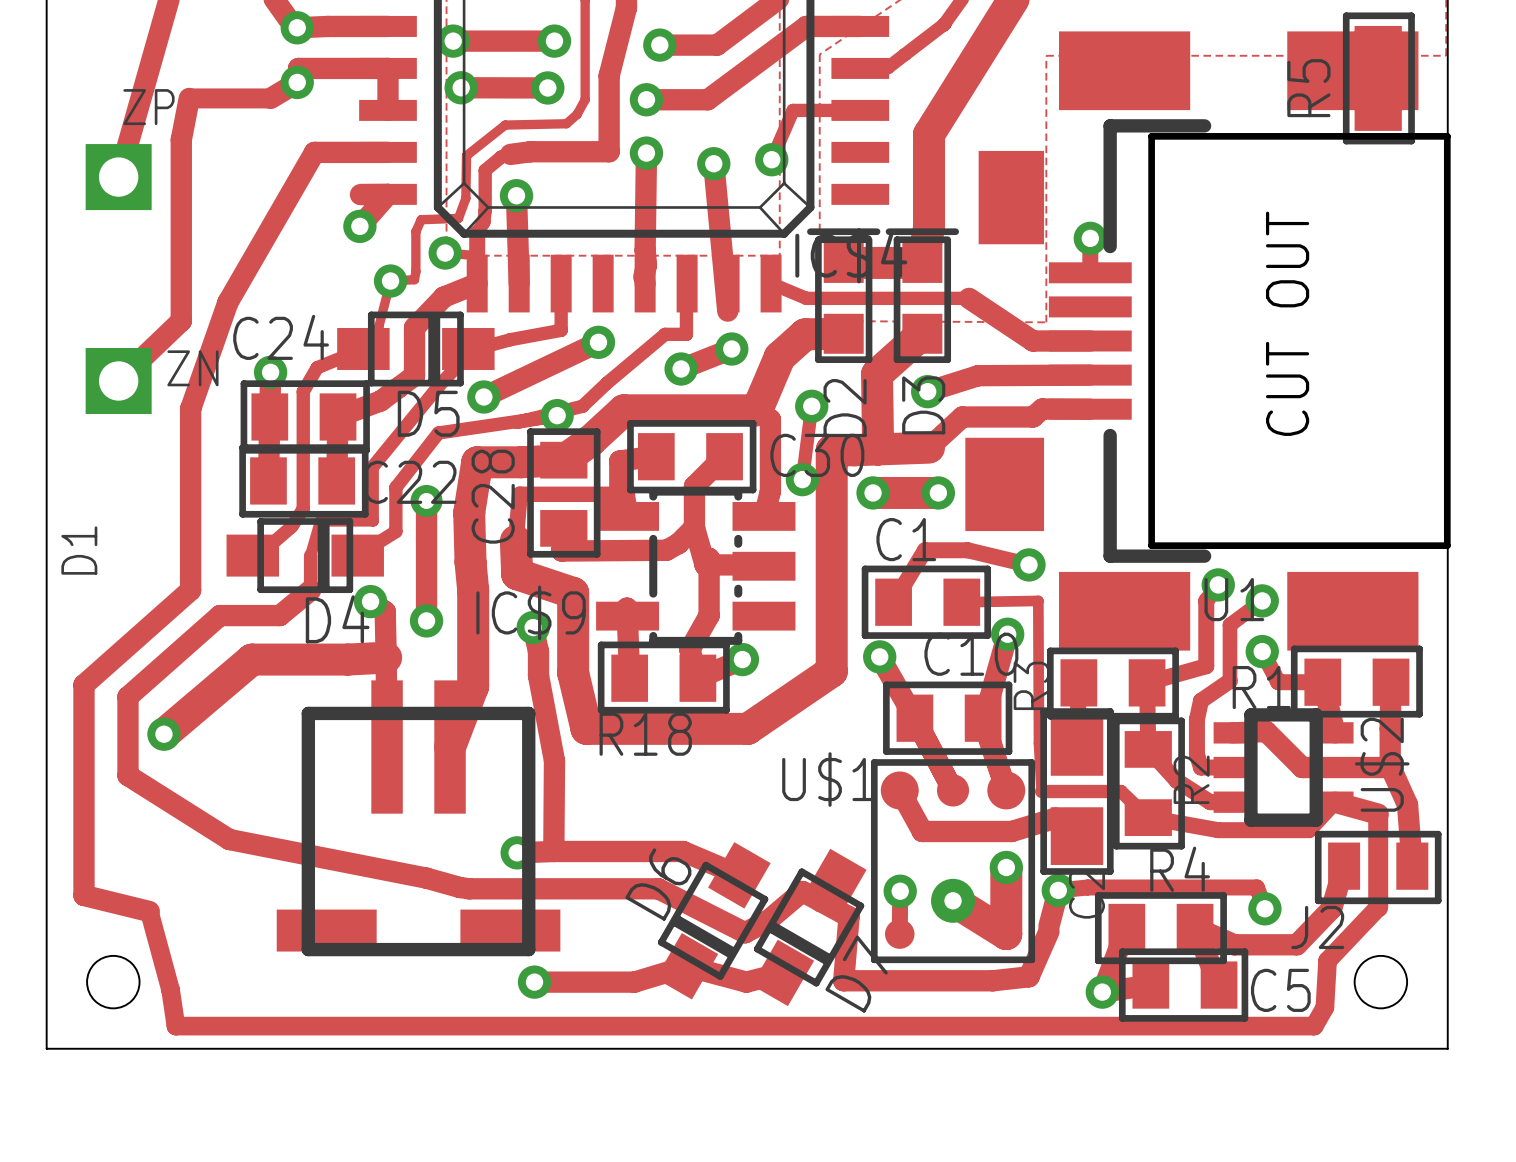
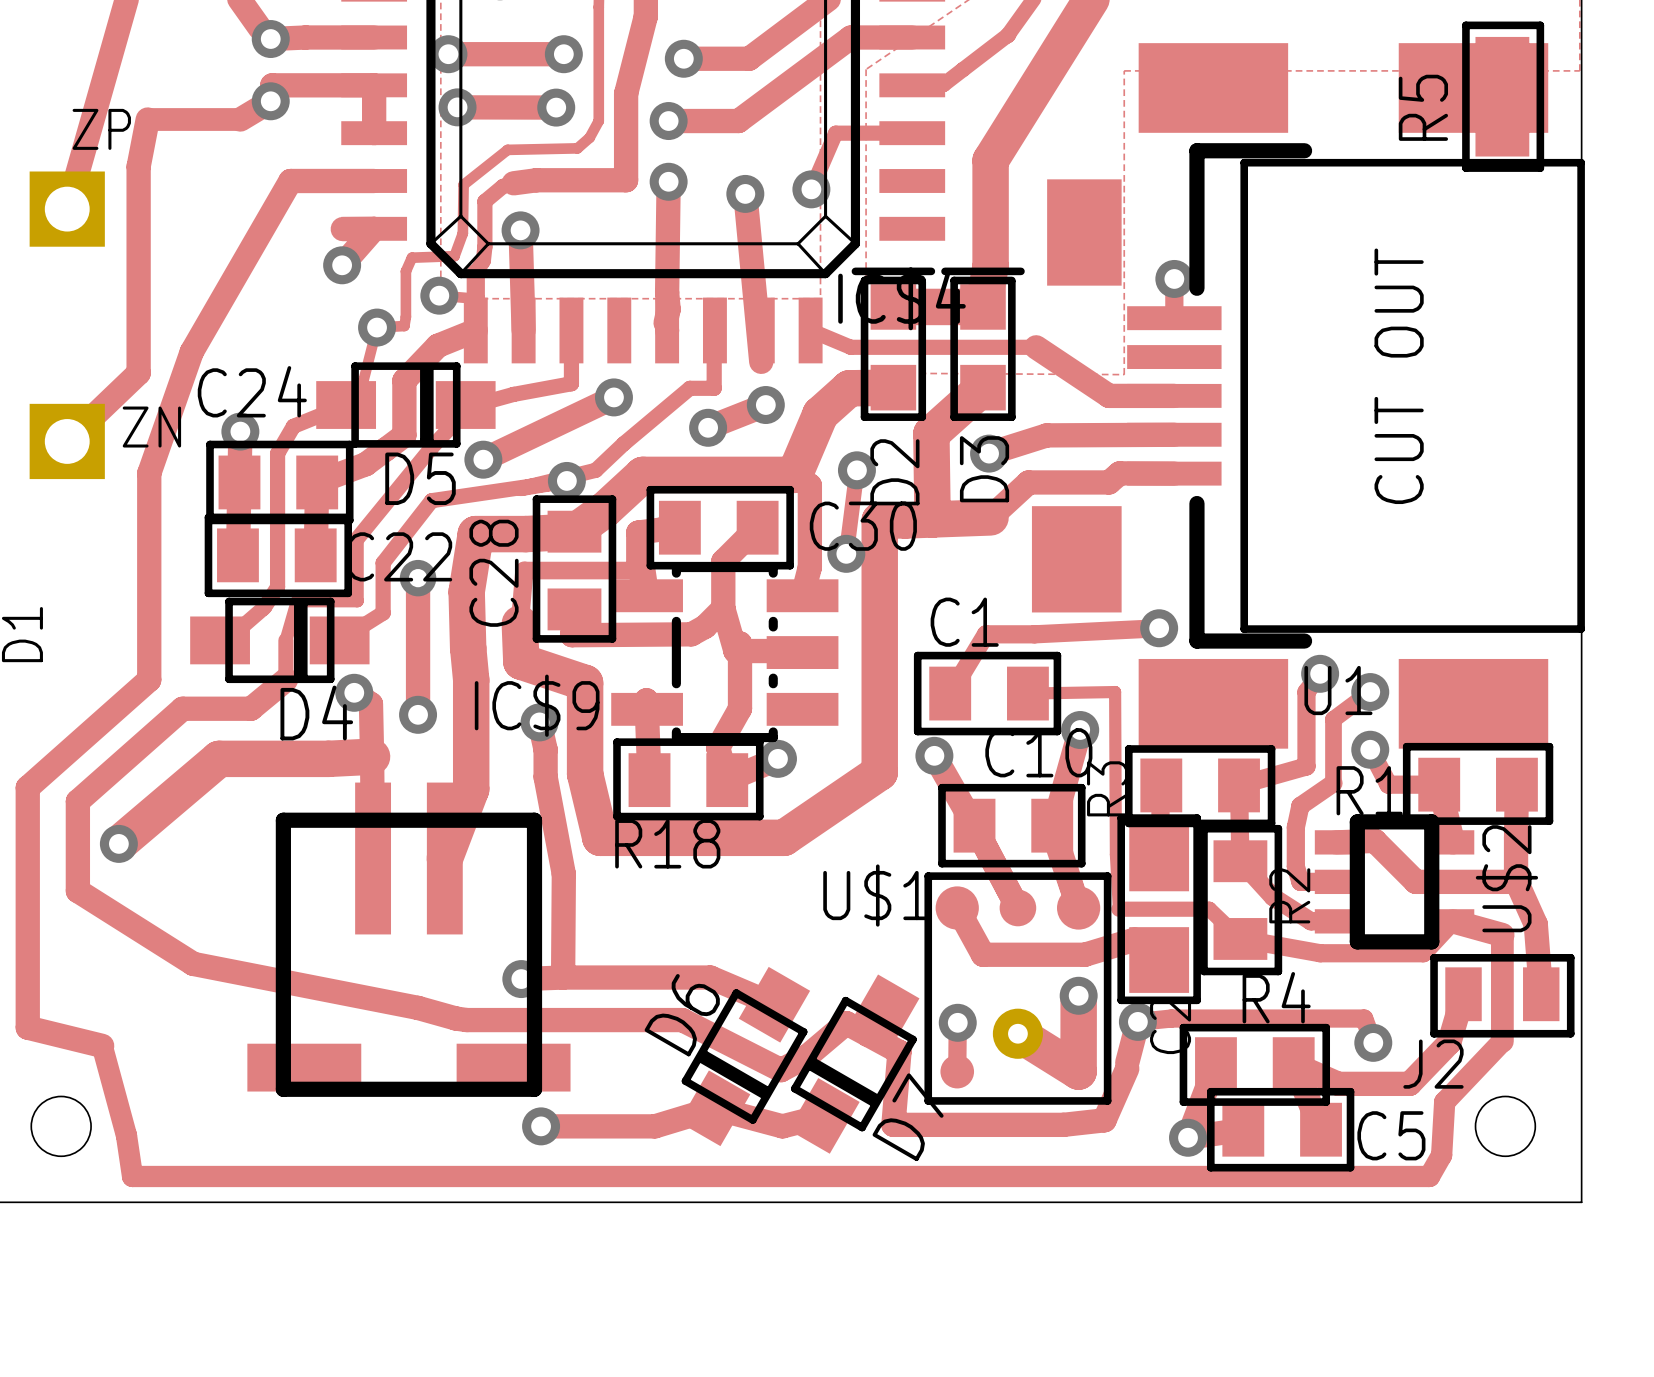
track: (873, 492) (938, 492) -> none
via: (873, 492) -> none
via: (938, 492) -> none
track: (967, 550) (1029, 564) -> (1034, 634) (1159, 628)
via position: (1029, 564) -> (1159, 628)

